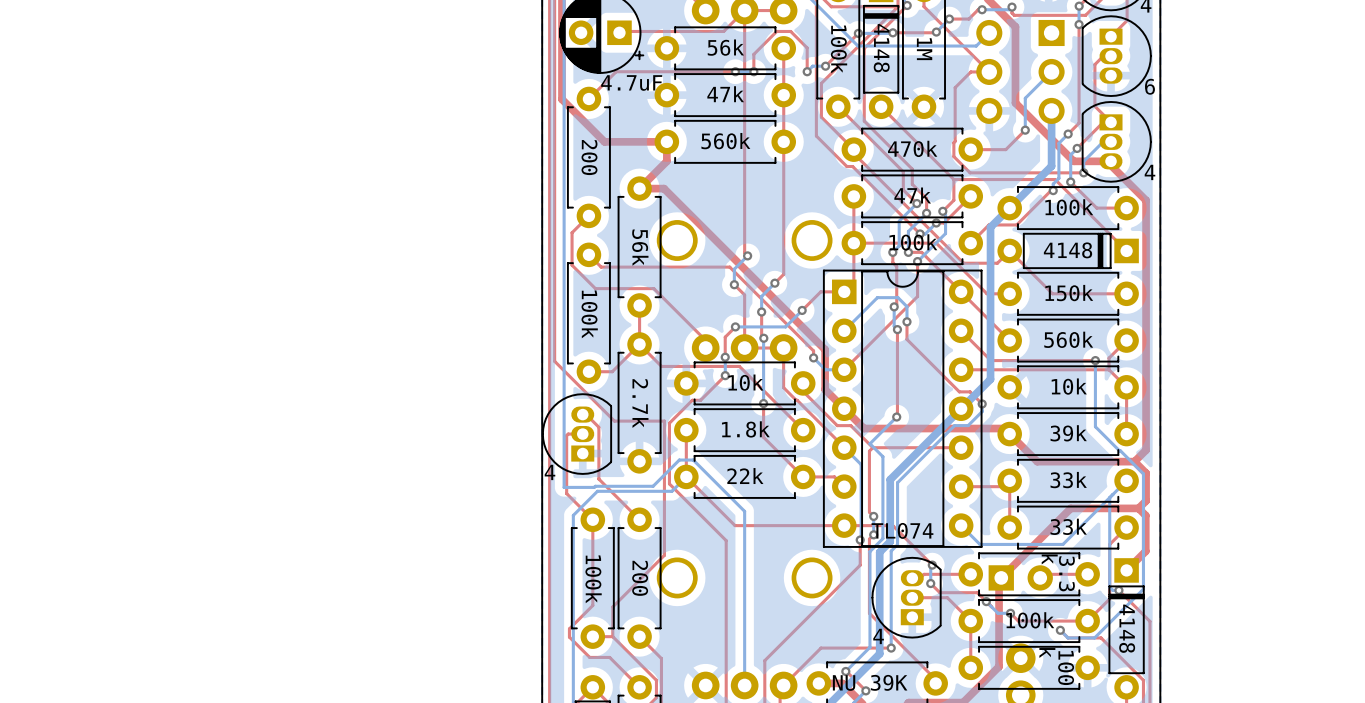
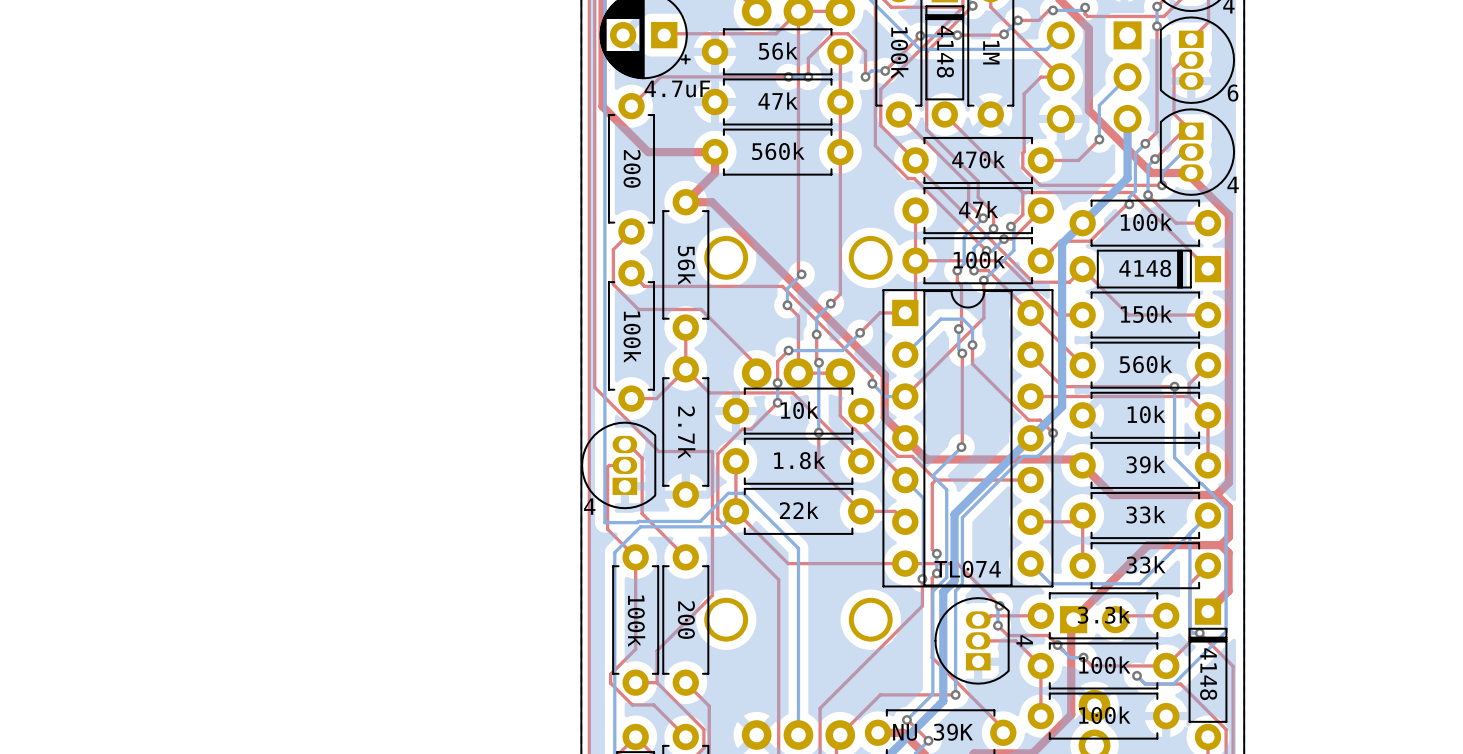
text: k (1049, 559) -> none
part value: 3.3 (1066, 573) -> 3.3k (1104, 615)
part value rotation: 0° (878, 636) -> 90° clockwise (1024, 640)
part value position: 4 (878, 636) -> 4 (1024, 640)
text: k (1047, 652) -> none
part value: 100 (1066, 668) -> 100k (1104, 715)

